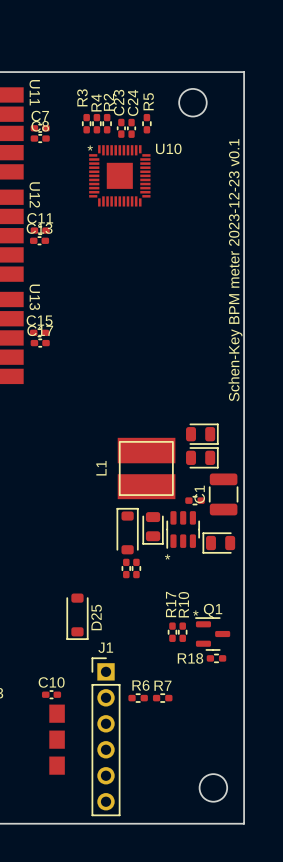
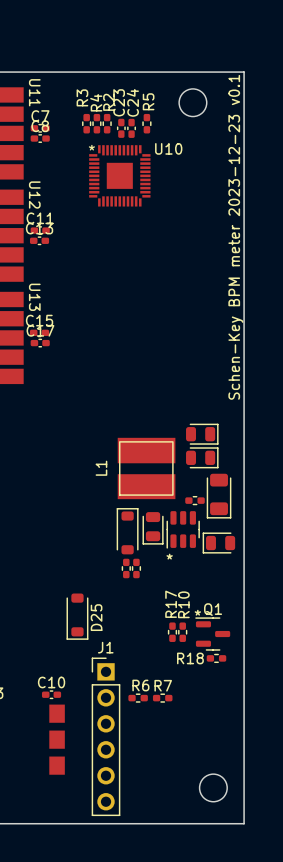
C1: (223, 494) -> none
part: none -> (219, 496)

